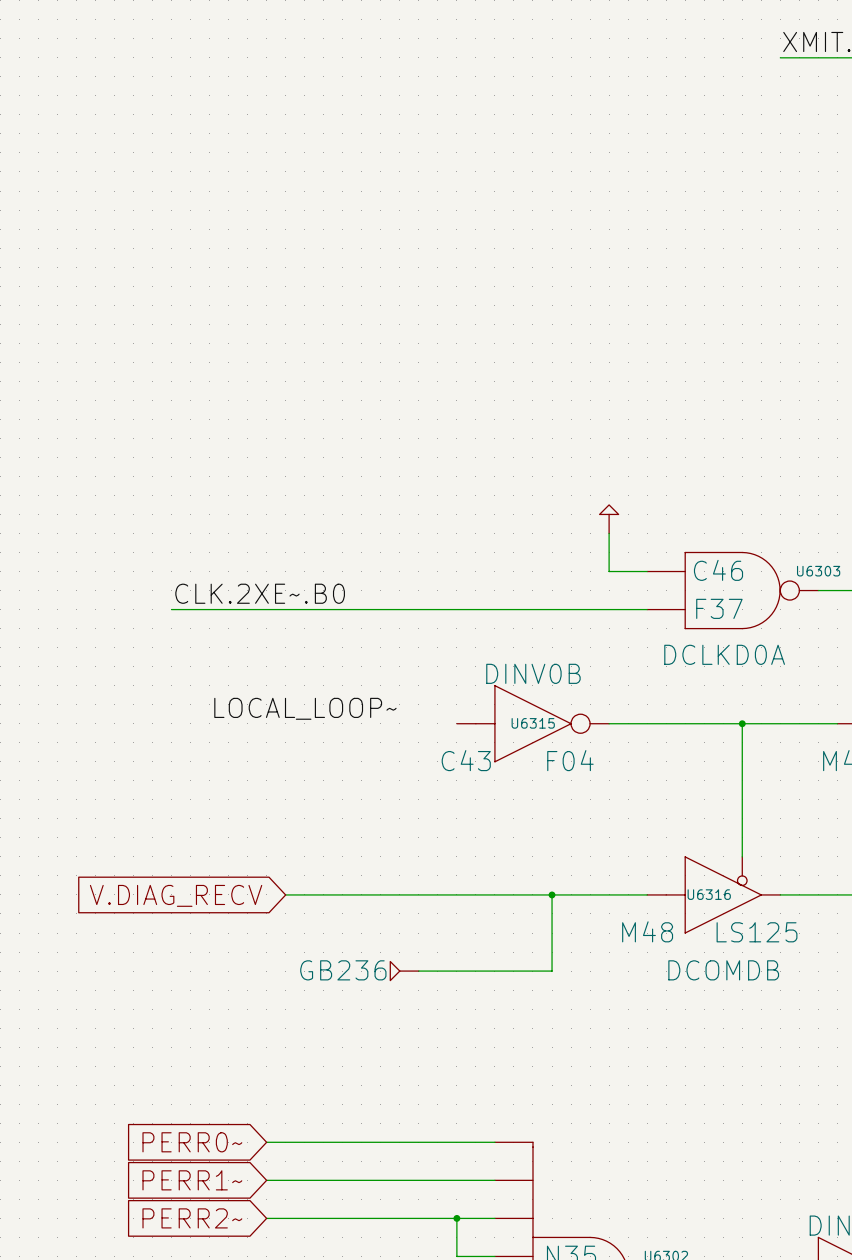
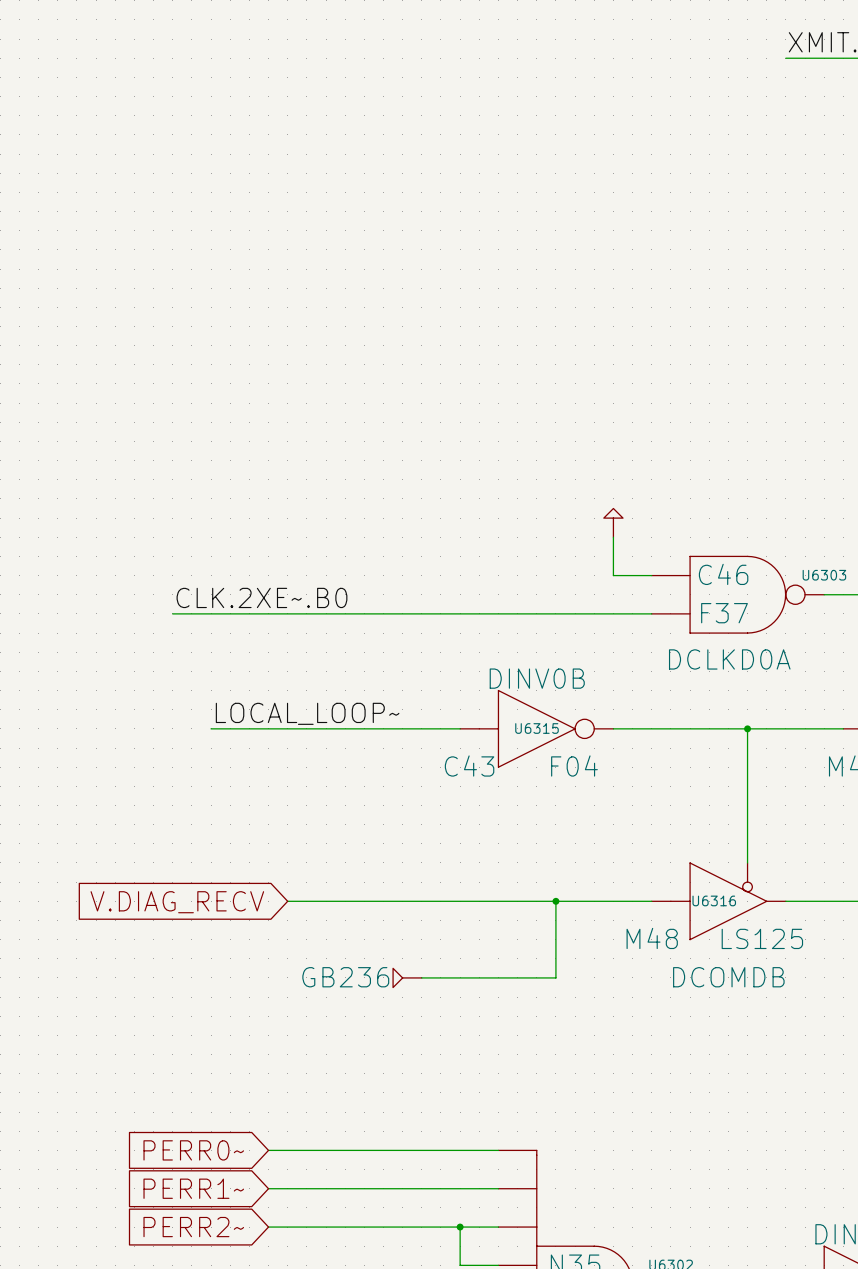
wire: none -> (211, 728) (460, 728)

